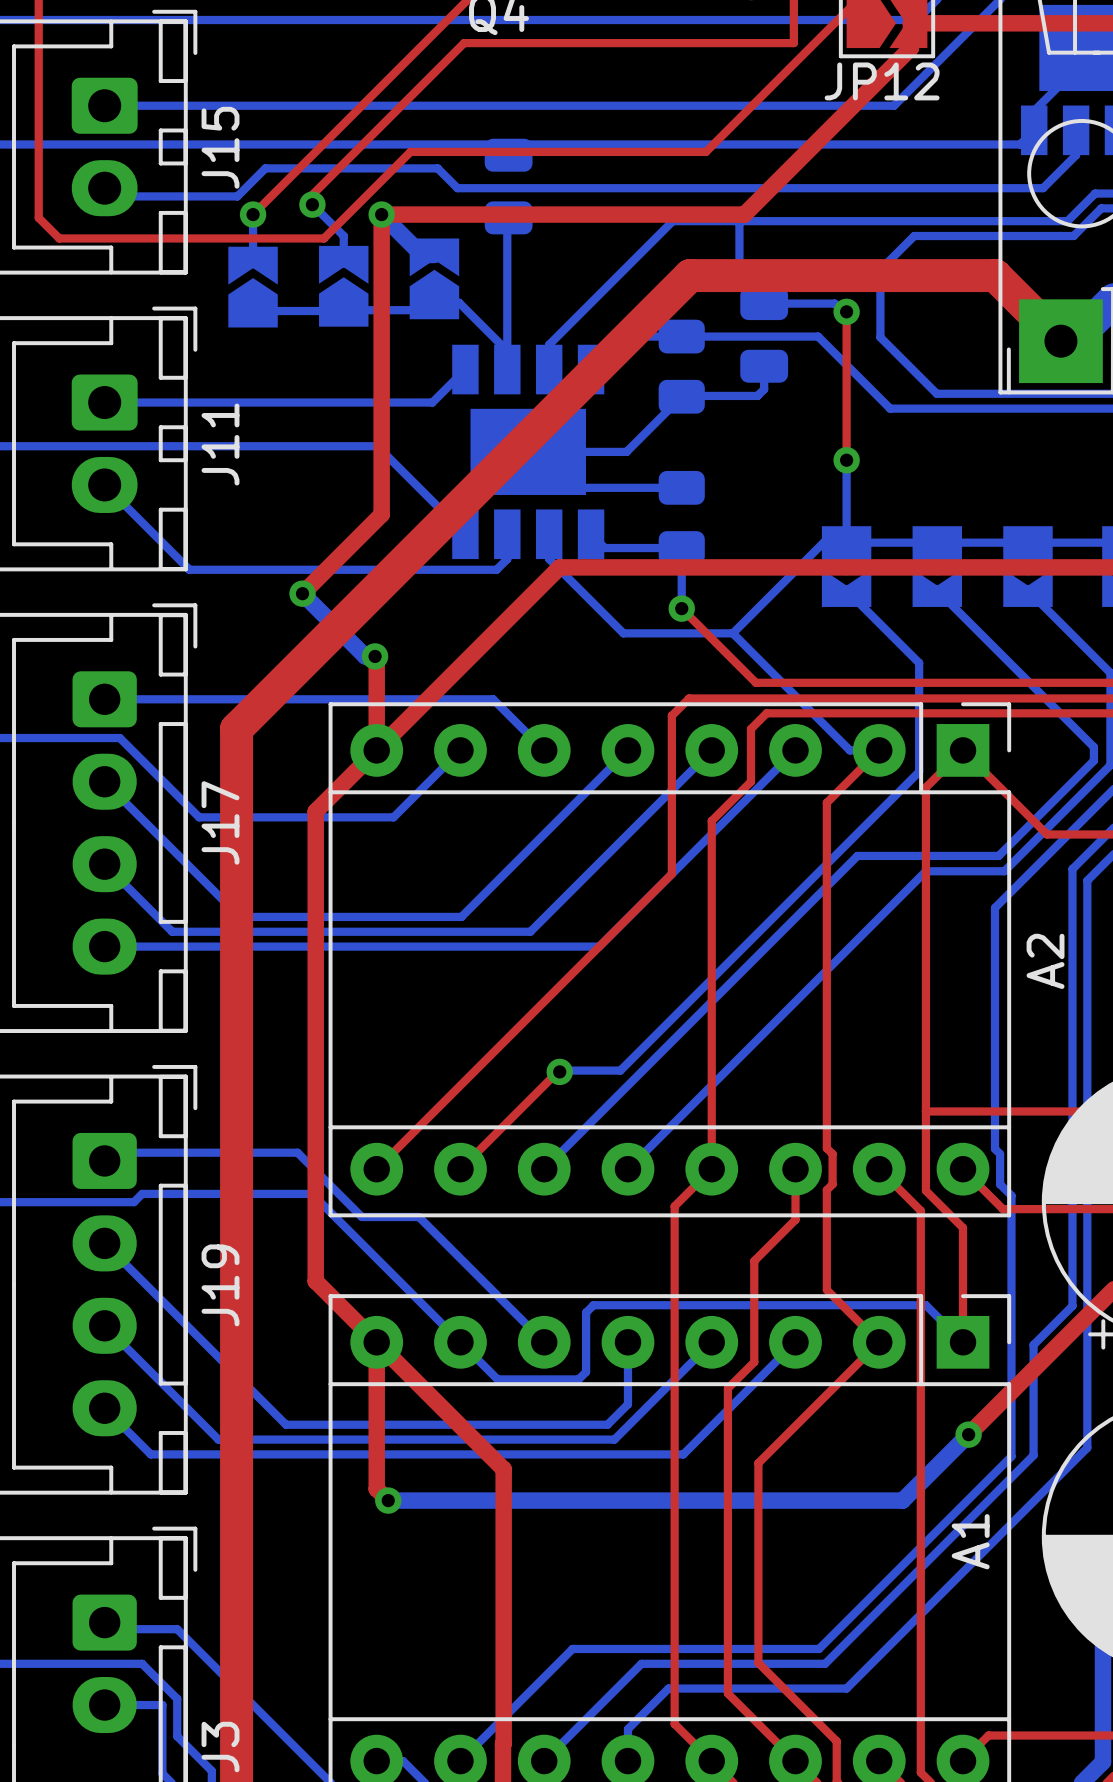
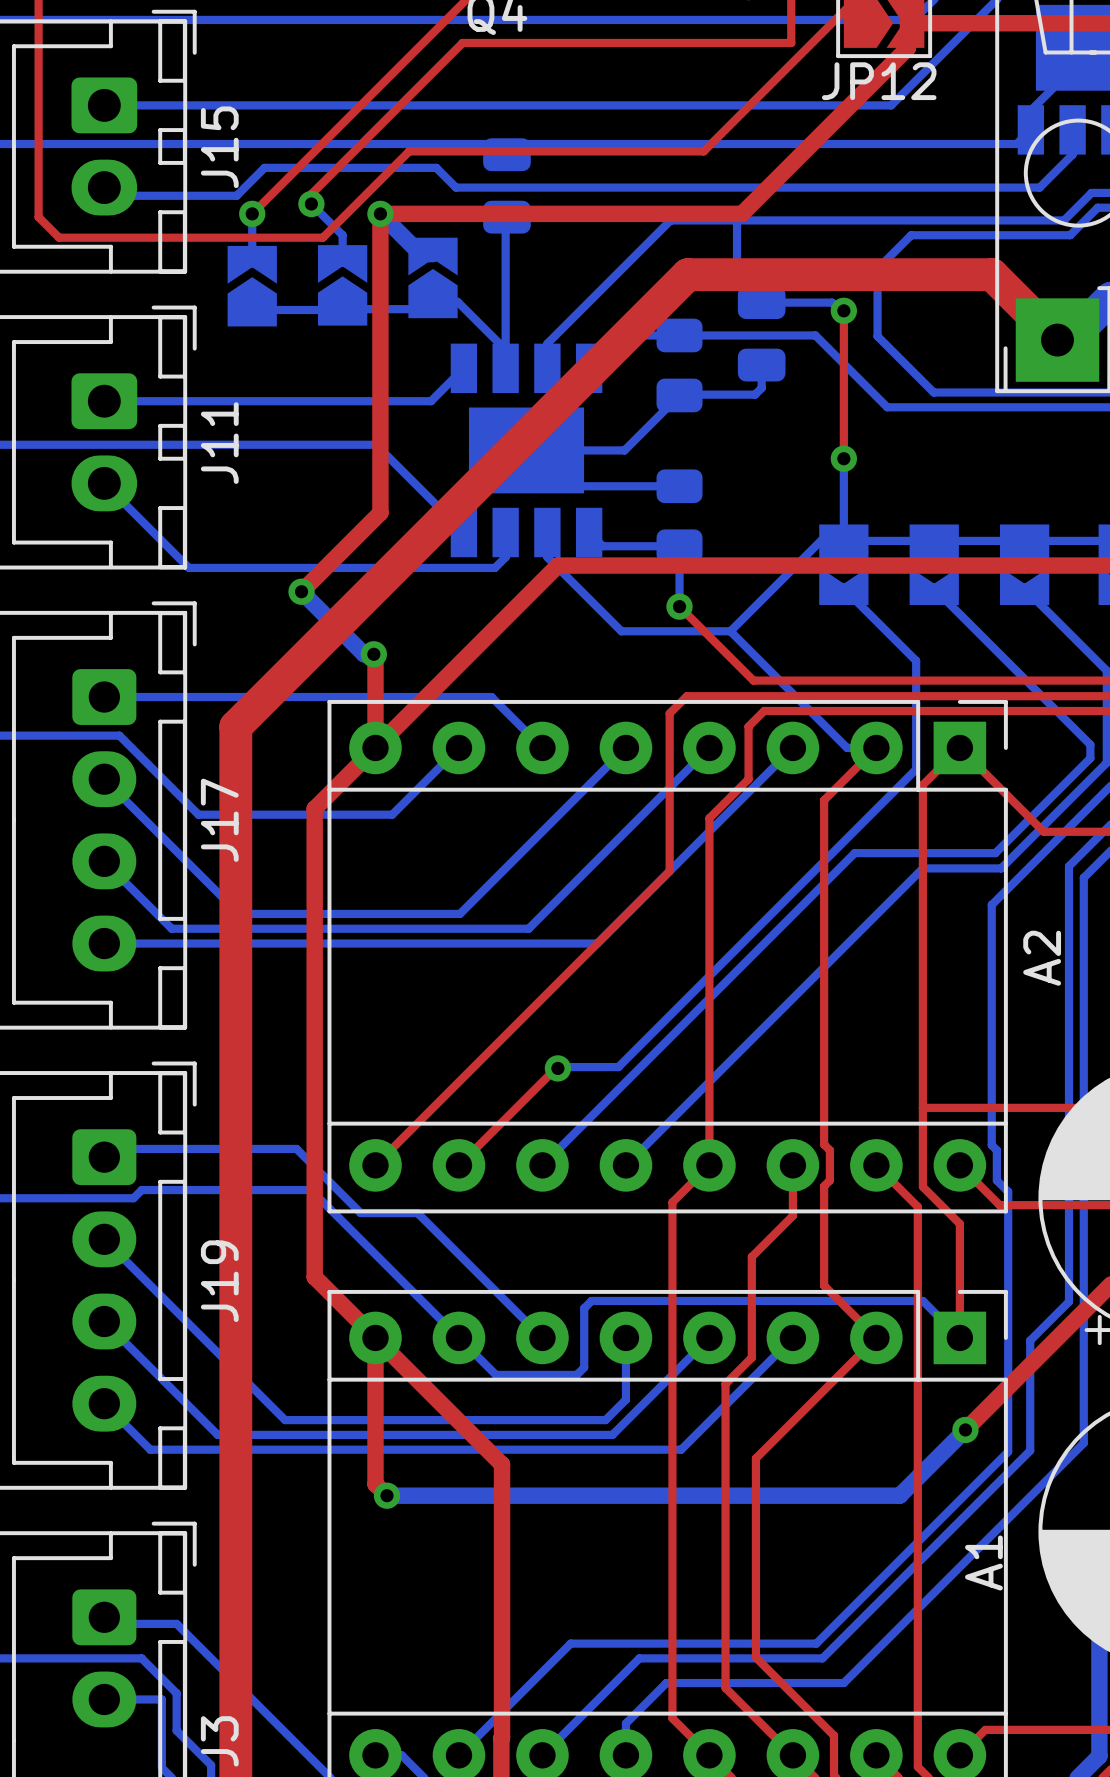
A1 name position: A1 (970, 1541) -> A1 (983, 1563)

